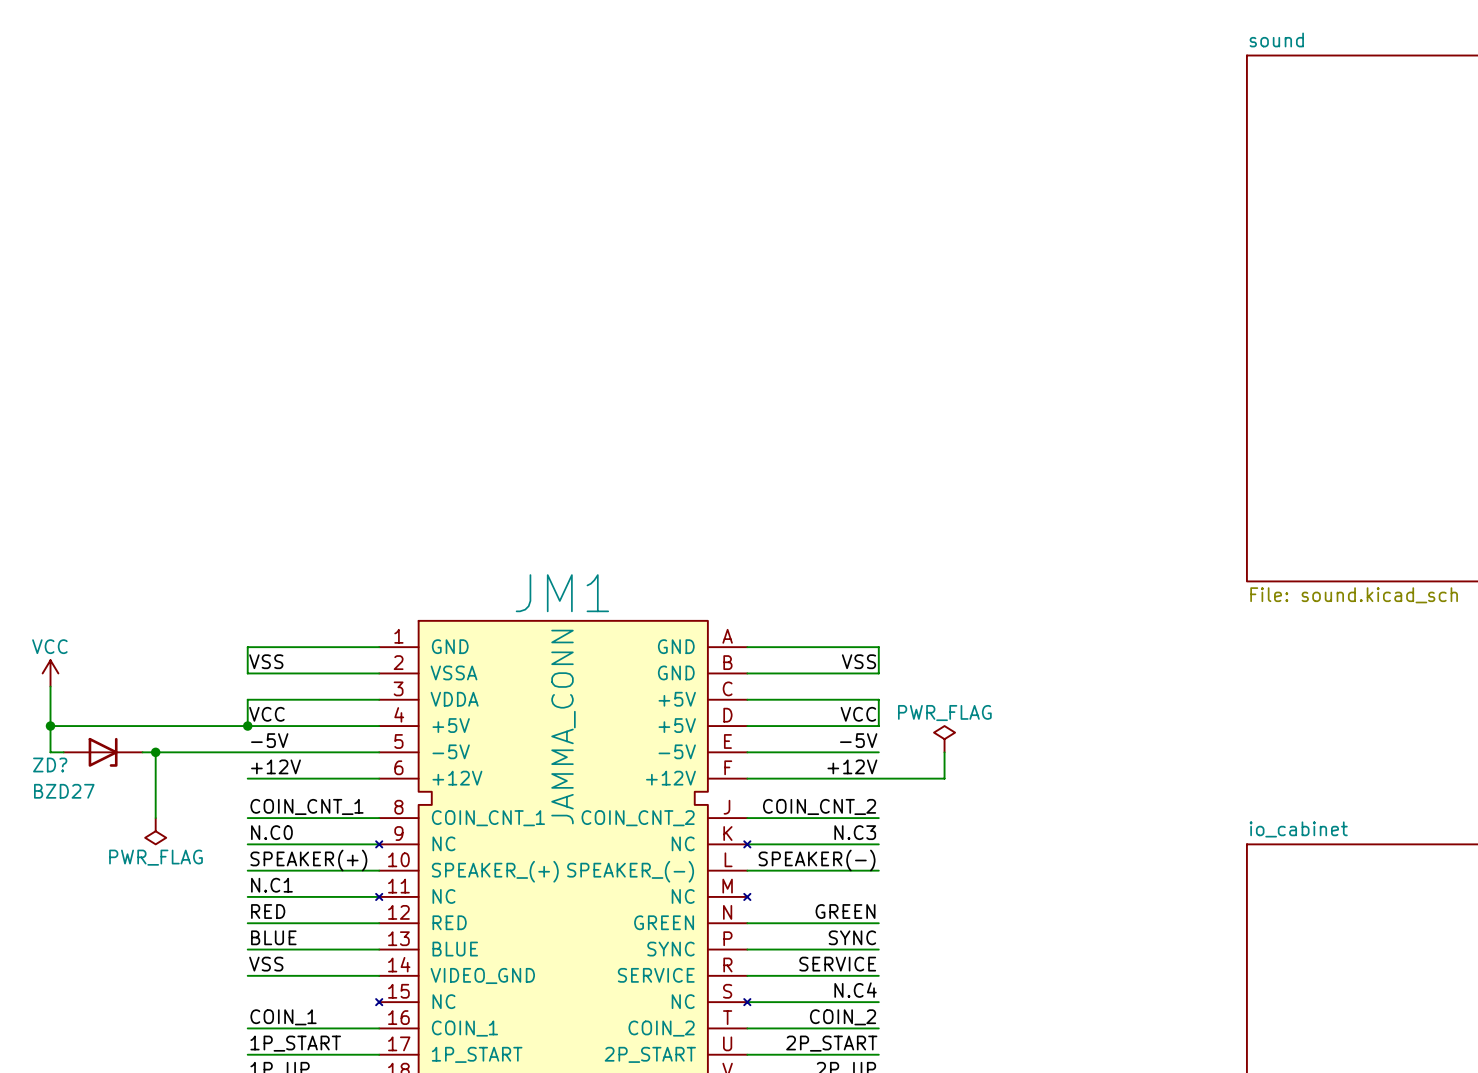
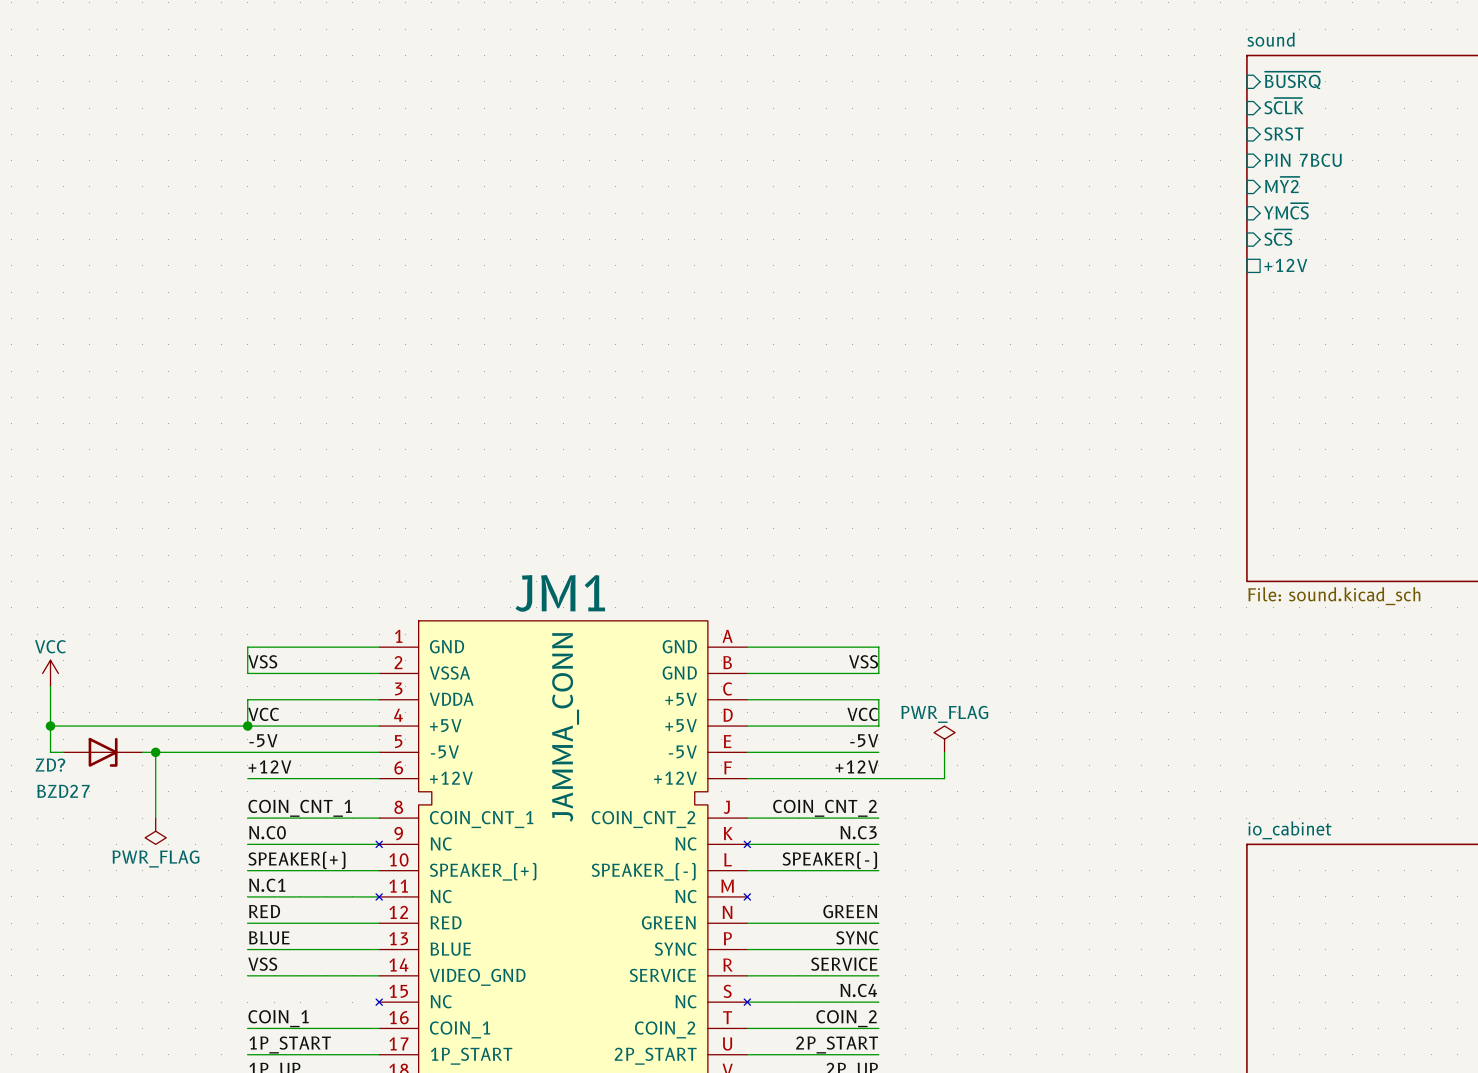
sheet pin: none -> ~{BUSRQ} (1292, 80)
sheet pin: none -> S~{CLK} (1283, 106)
sheet pin: none -> SRST (1283, 133)
sheet pin: none -> PIN 7BCU (1303, 160)
sheet pin: none -> M~{Y2} (1282, 184)
sheet pin: none -> YM~{CS} (1286, 211)
sheet pin: none -> S~{CS} (1278, 237)
sheet pin: none -> +12V (1285, 265)

